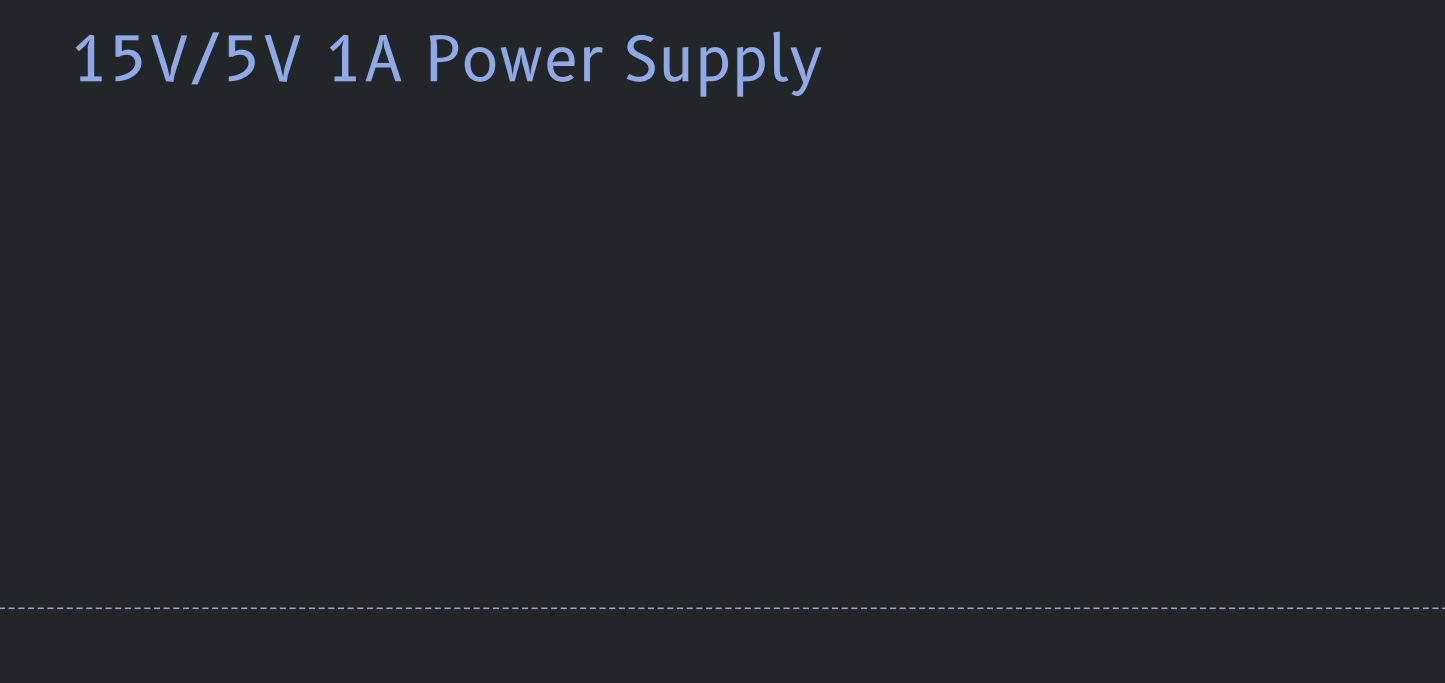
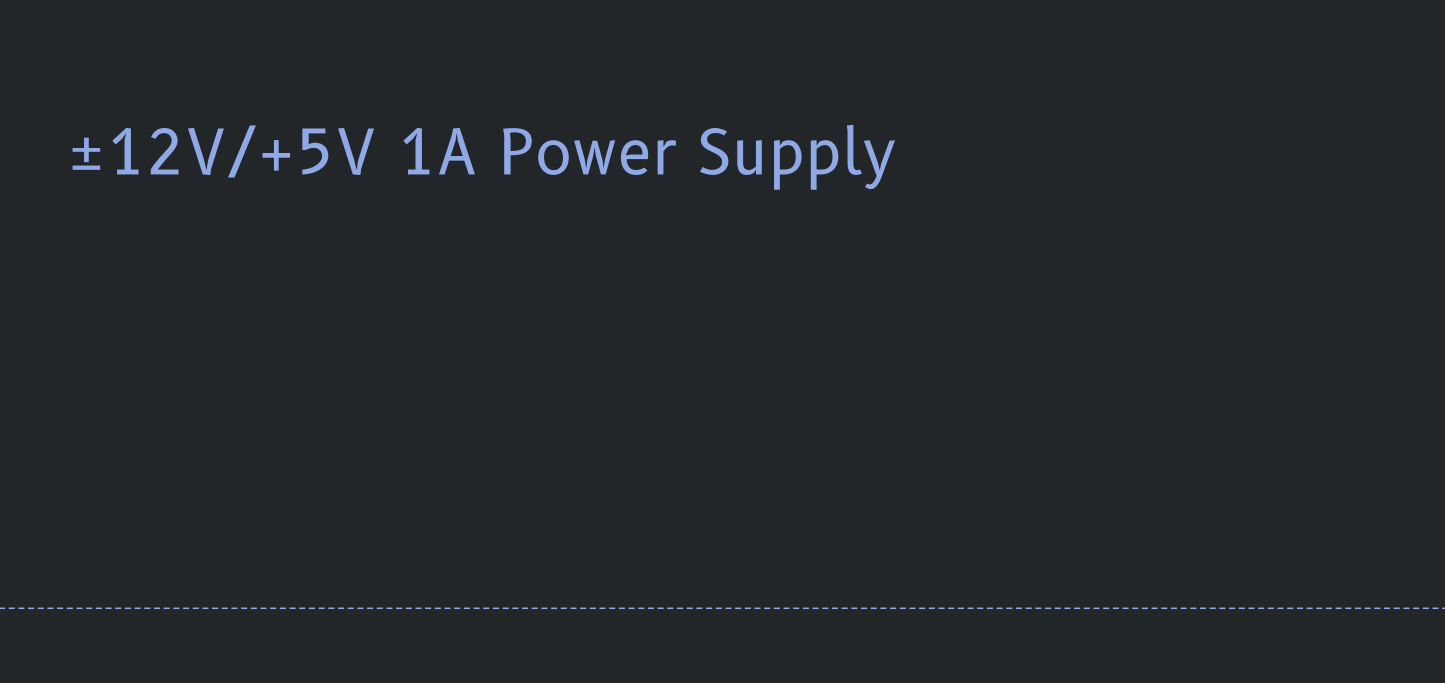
text: 15V/5V 1A Power Supply (448, 64) -> ±12V/+5V 1A Power Supply (483, 157)

